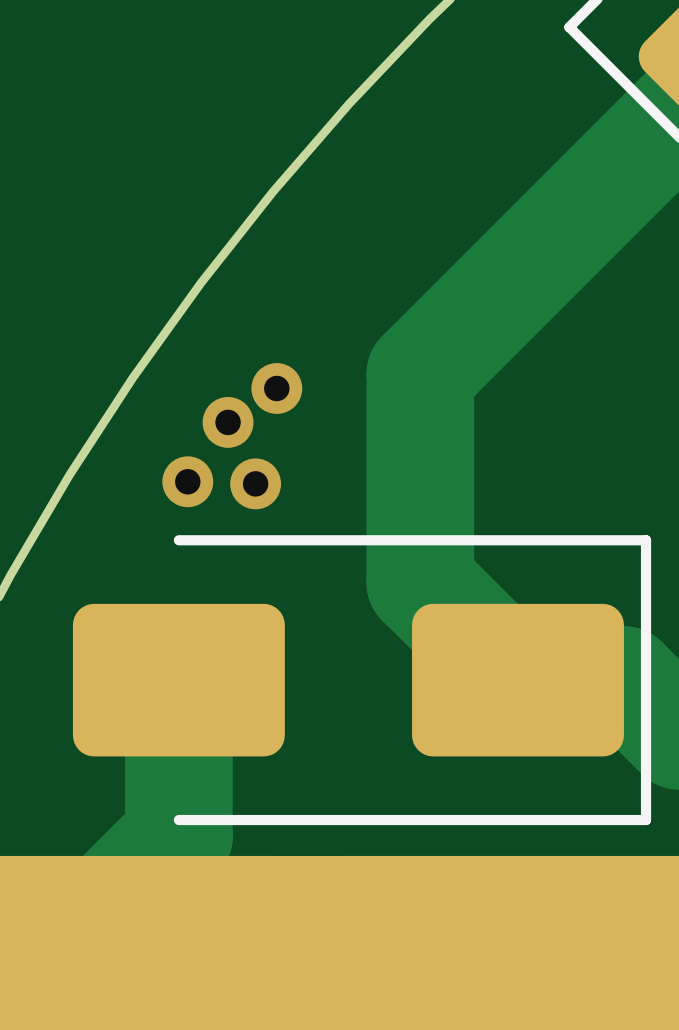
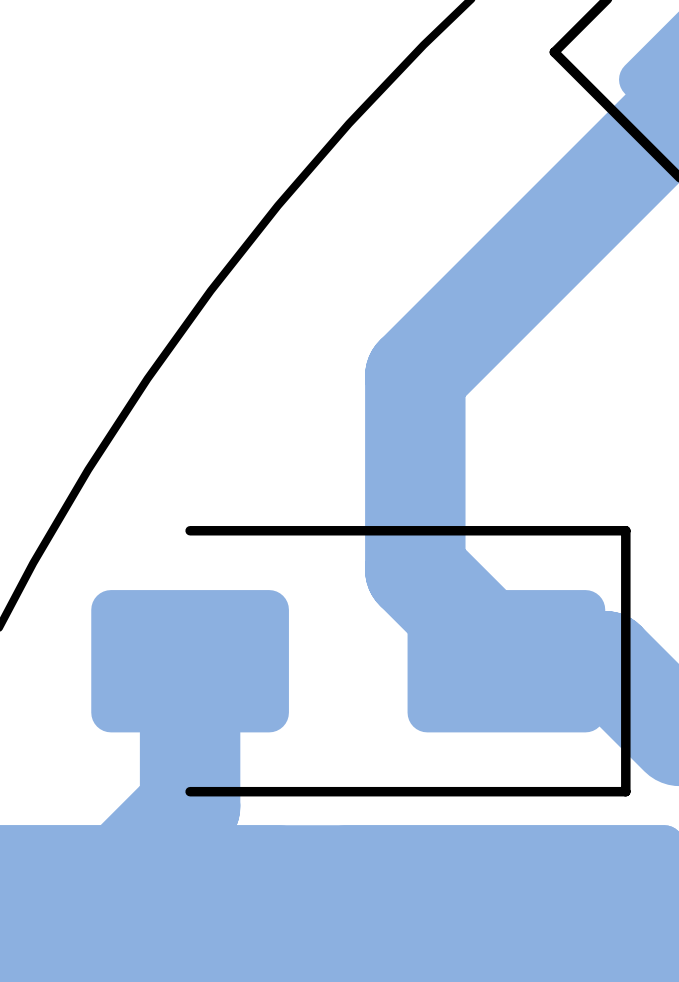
via: (276, 388) -> none
via: (228, 422) -> none
via: (187, 481) -> none
via: (255, 483) -> none

